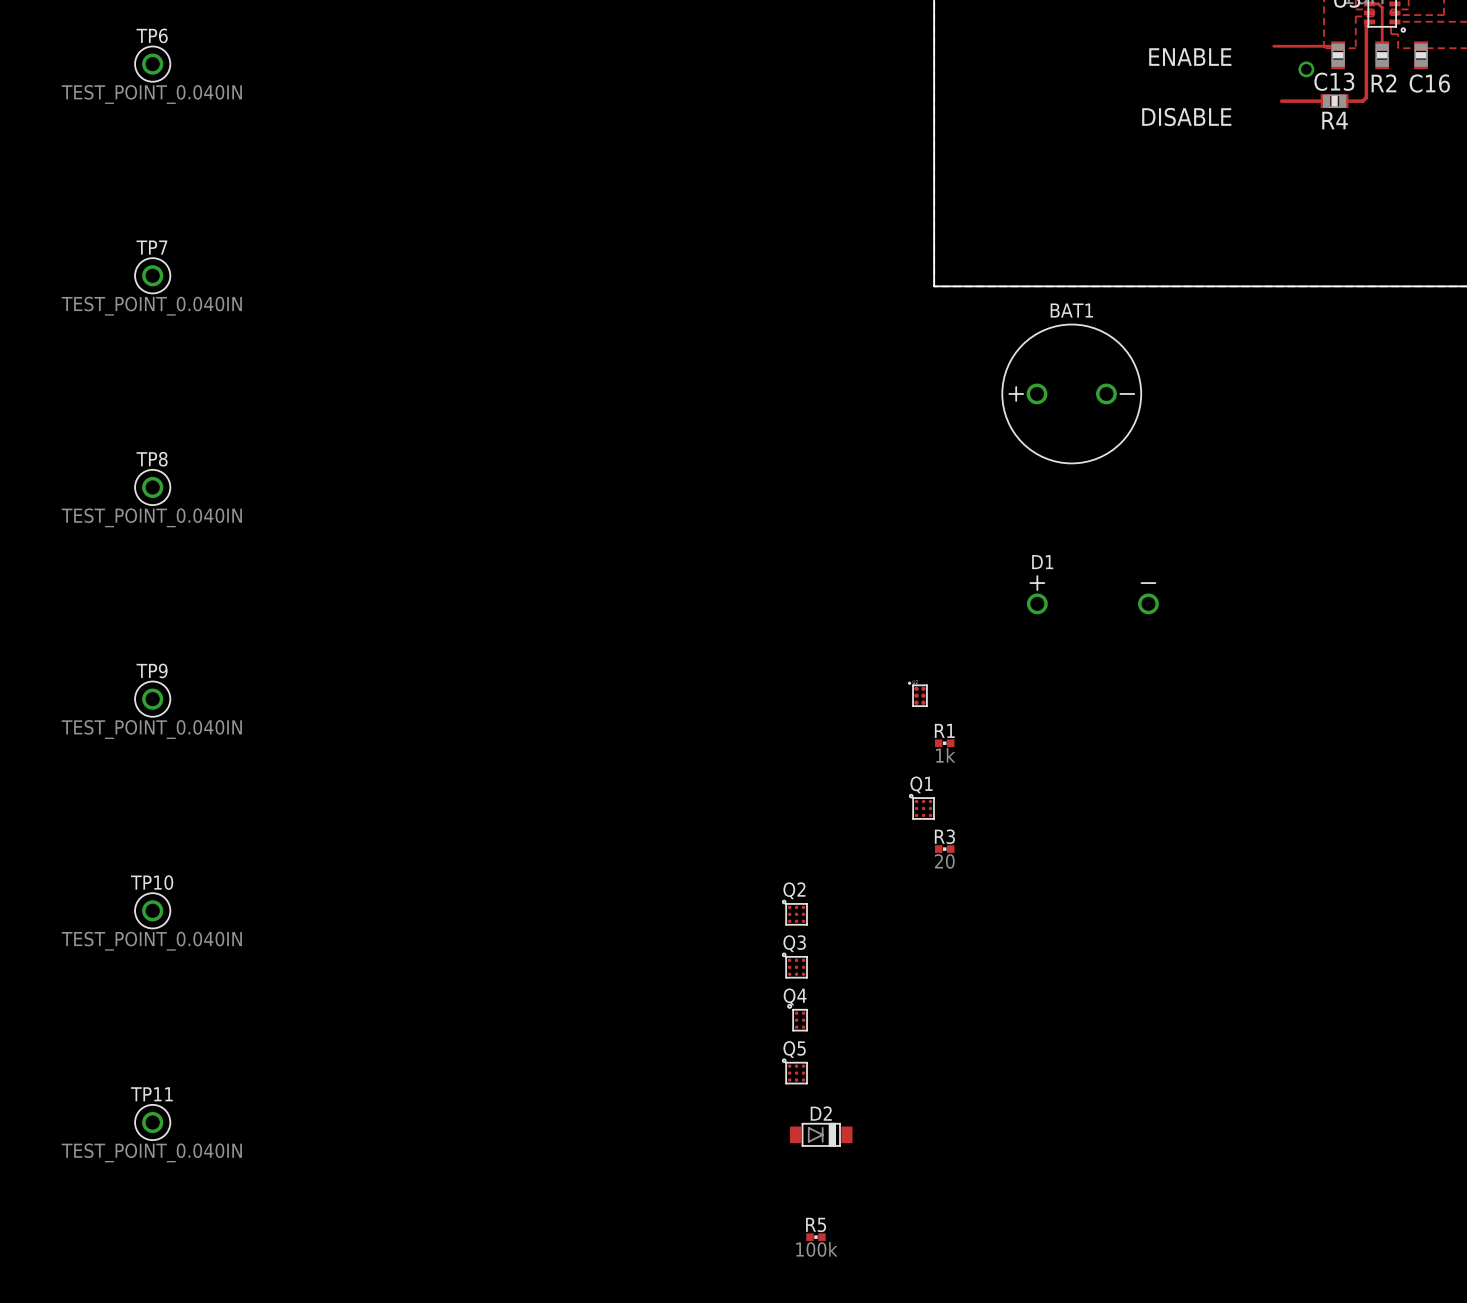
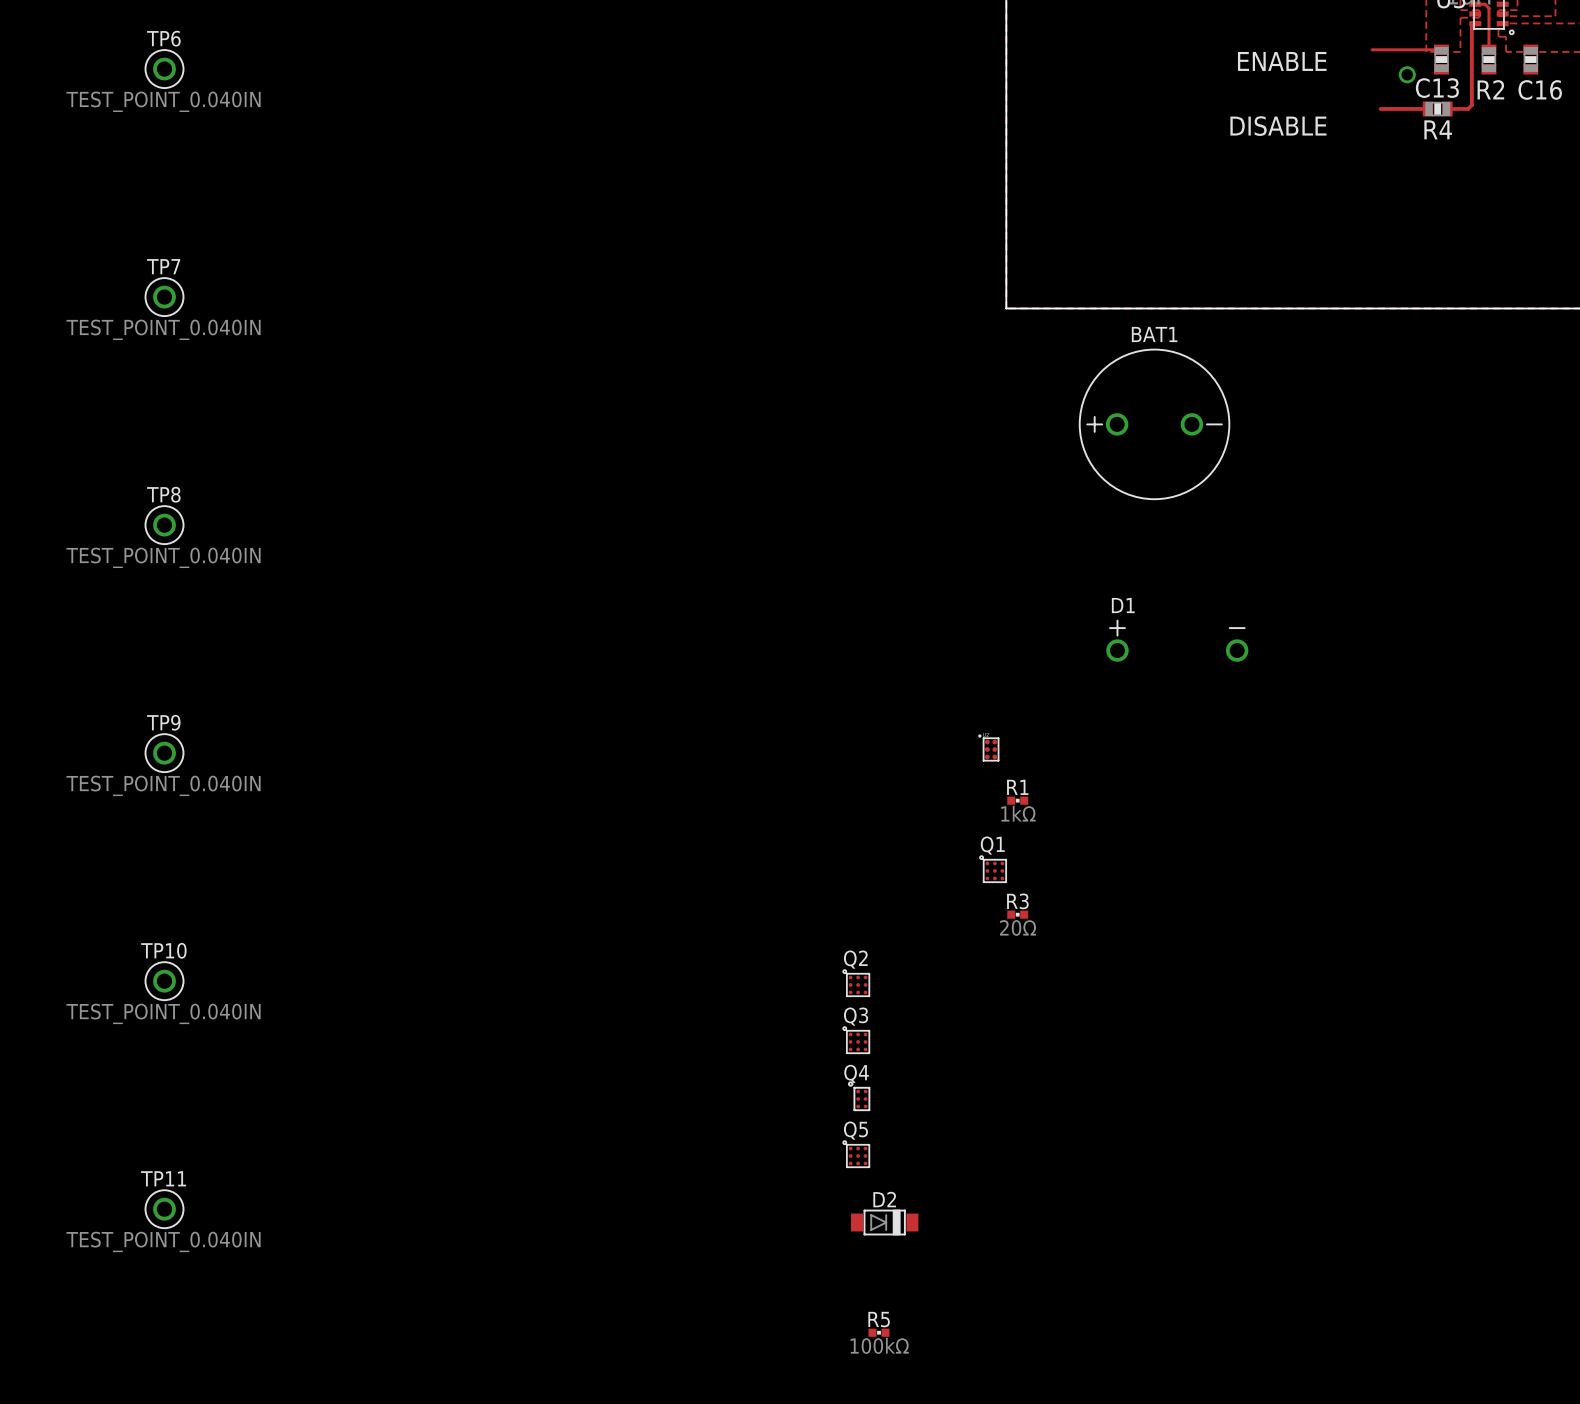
R1 value: 1k (945, 755) -> 1kΩ (1018, 813)
R3 value: 20 (944, 861) -> 20Ω (1018, 927)
R5 value: 100k (816, 1249) -> 100kΩ (879, 1345)

